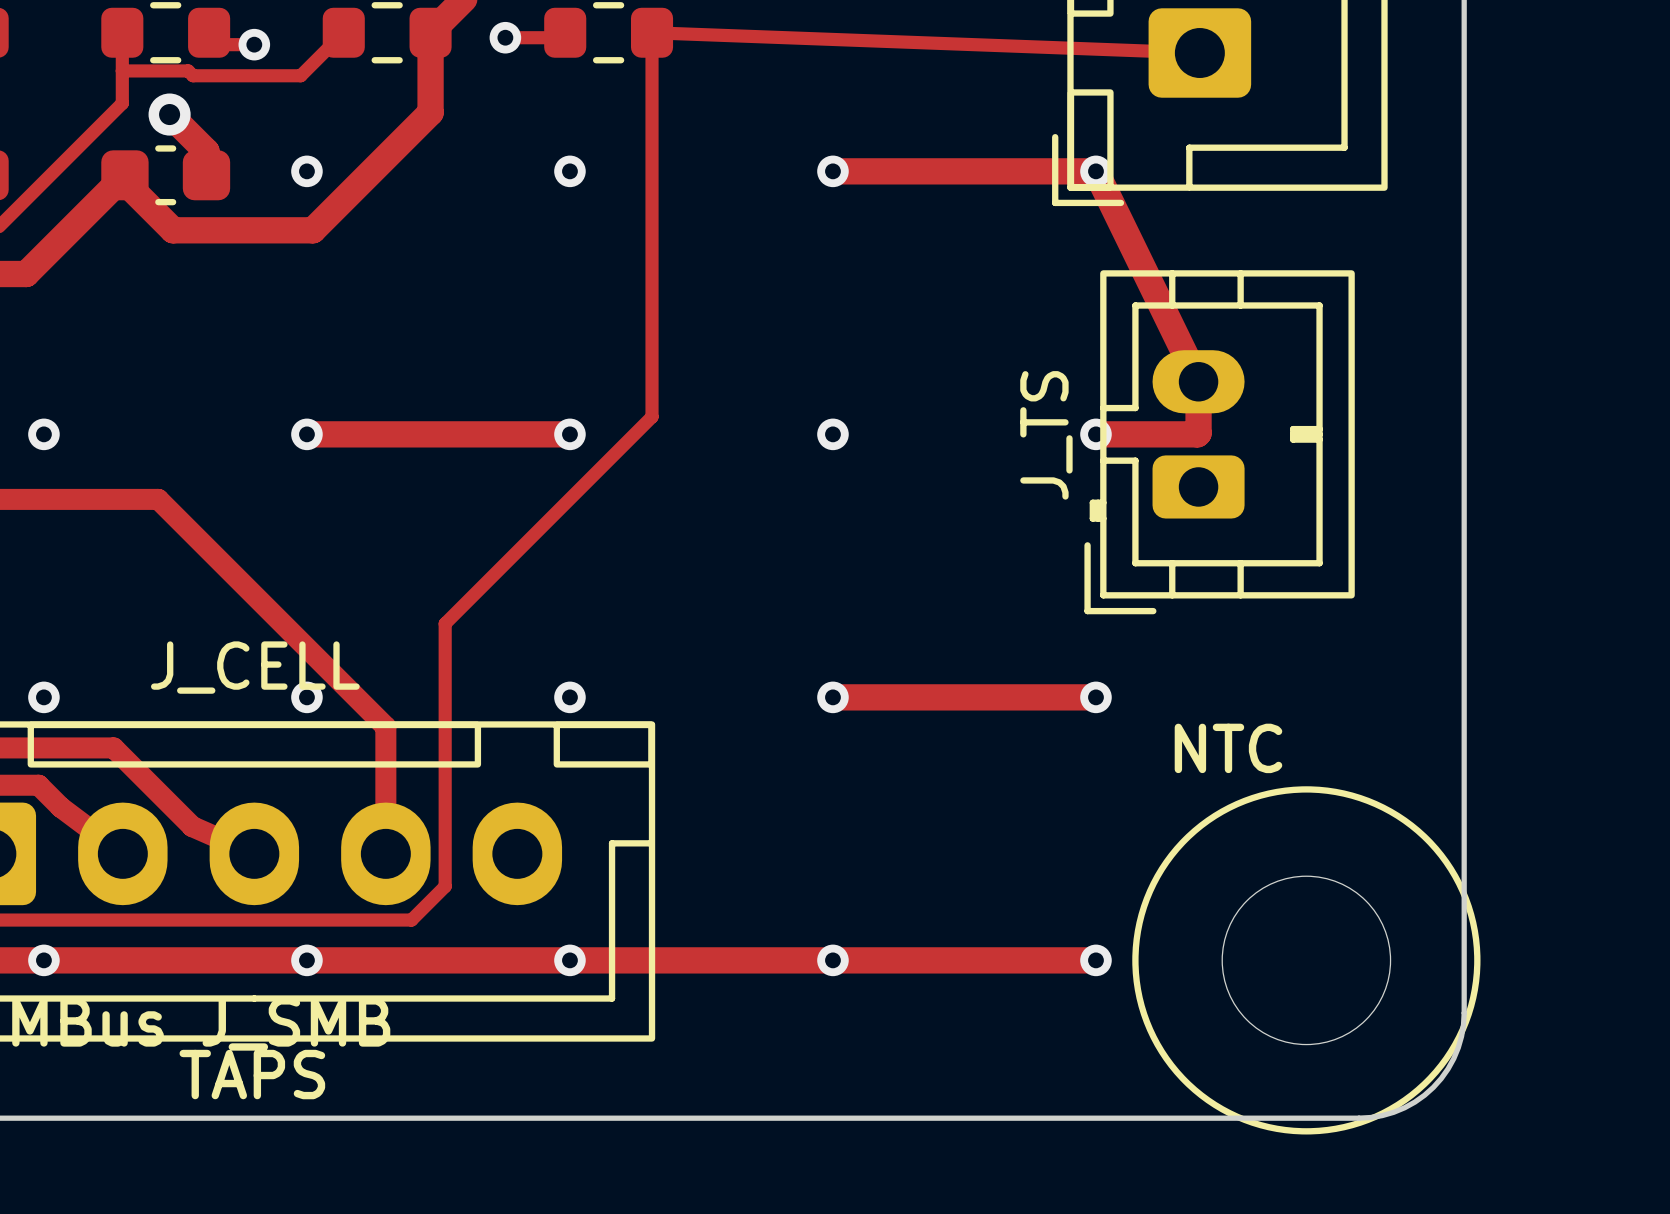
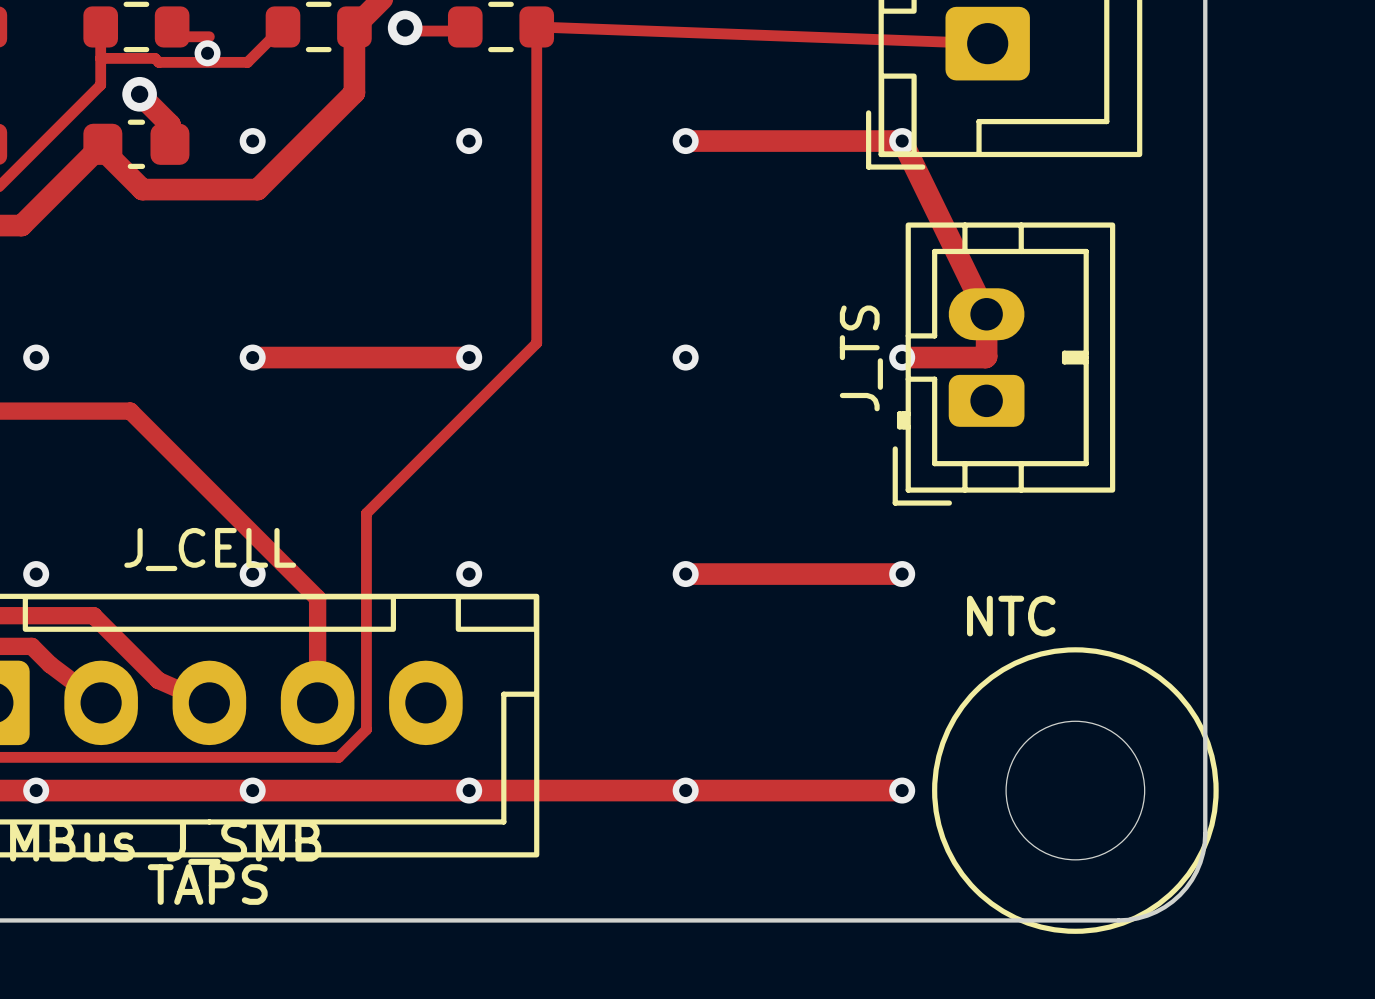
via size: [489, 21, 522, 54] -> [387, 10, 423, 46]
via position: (254, 44) -> (207, 53)

